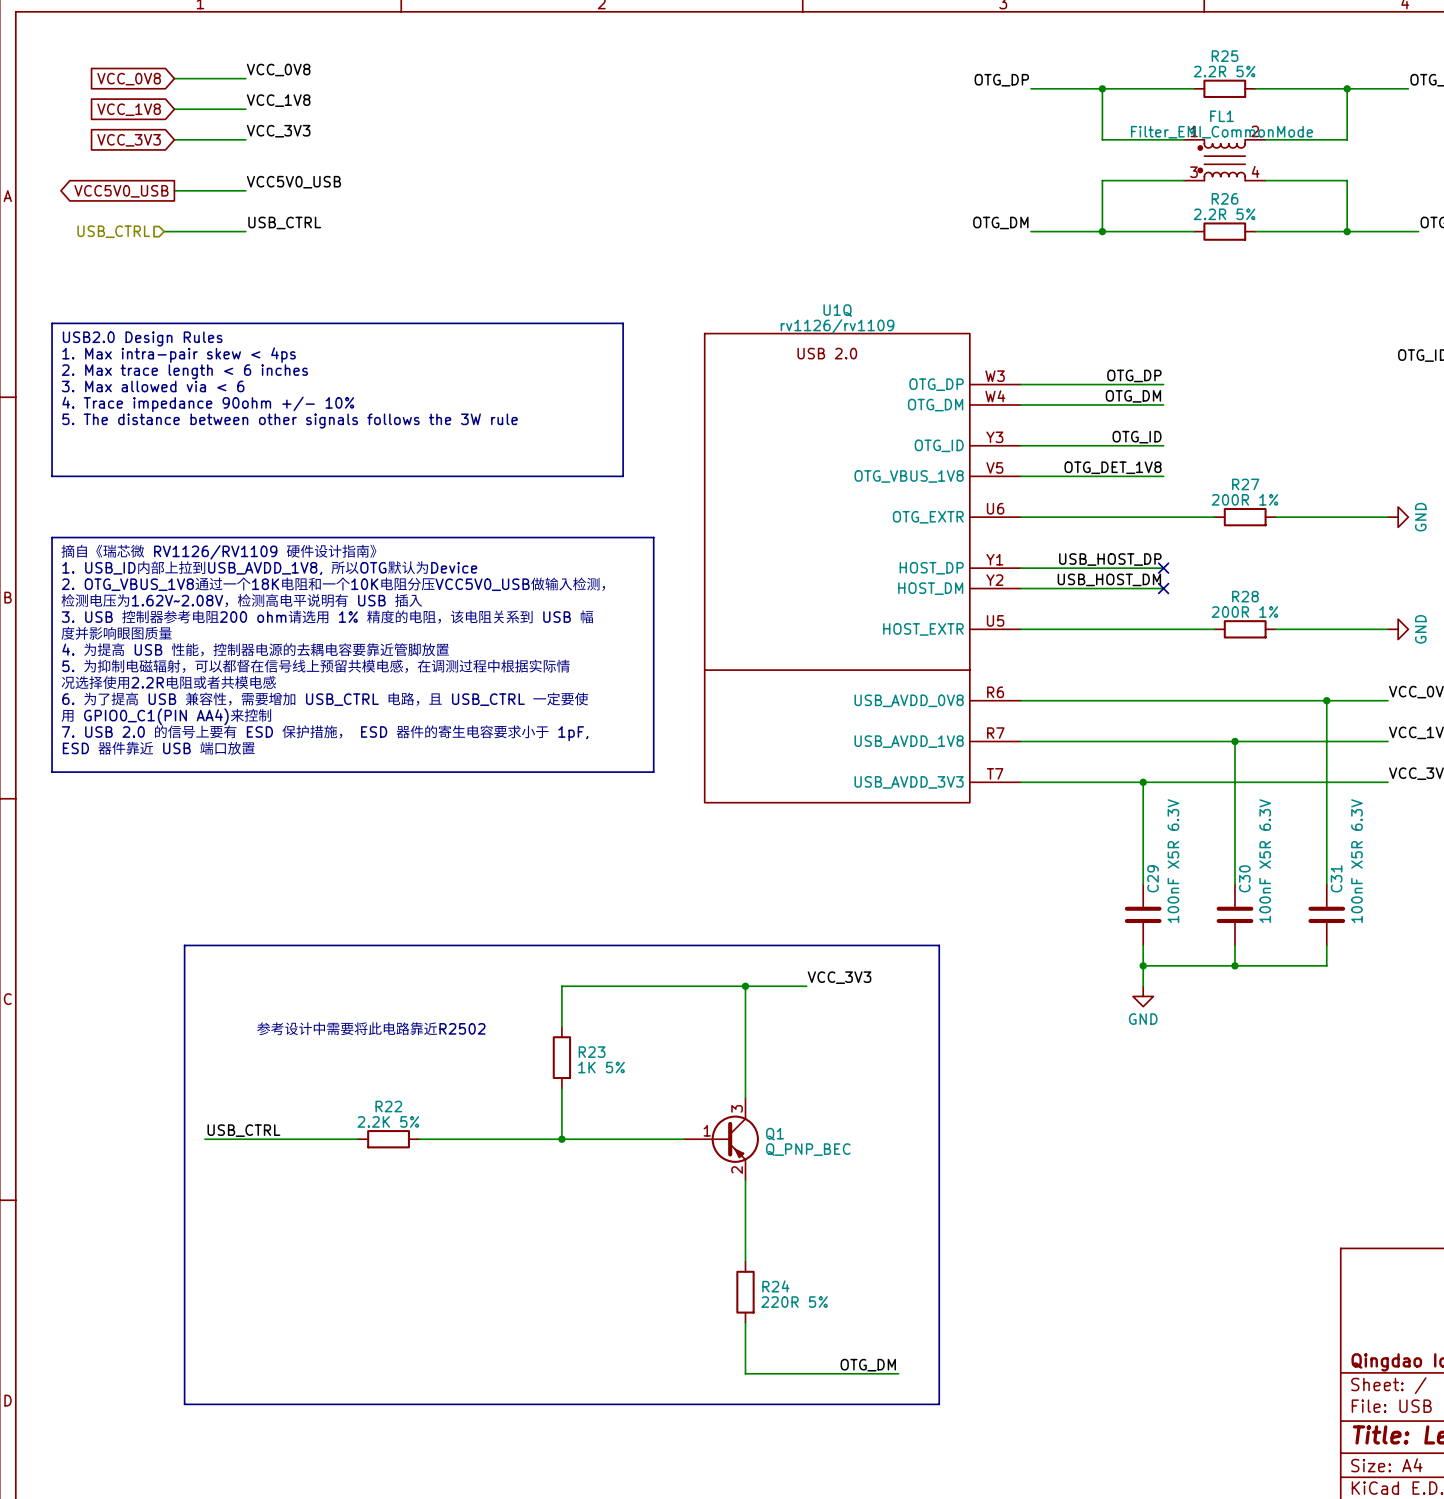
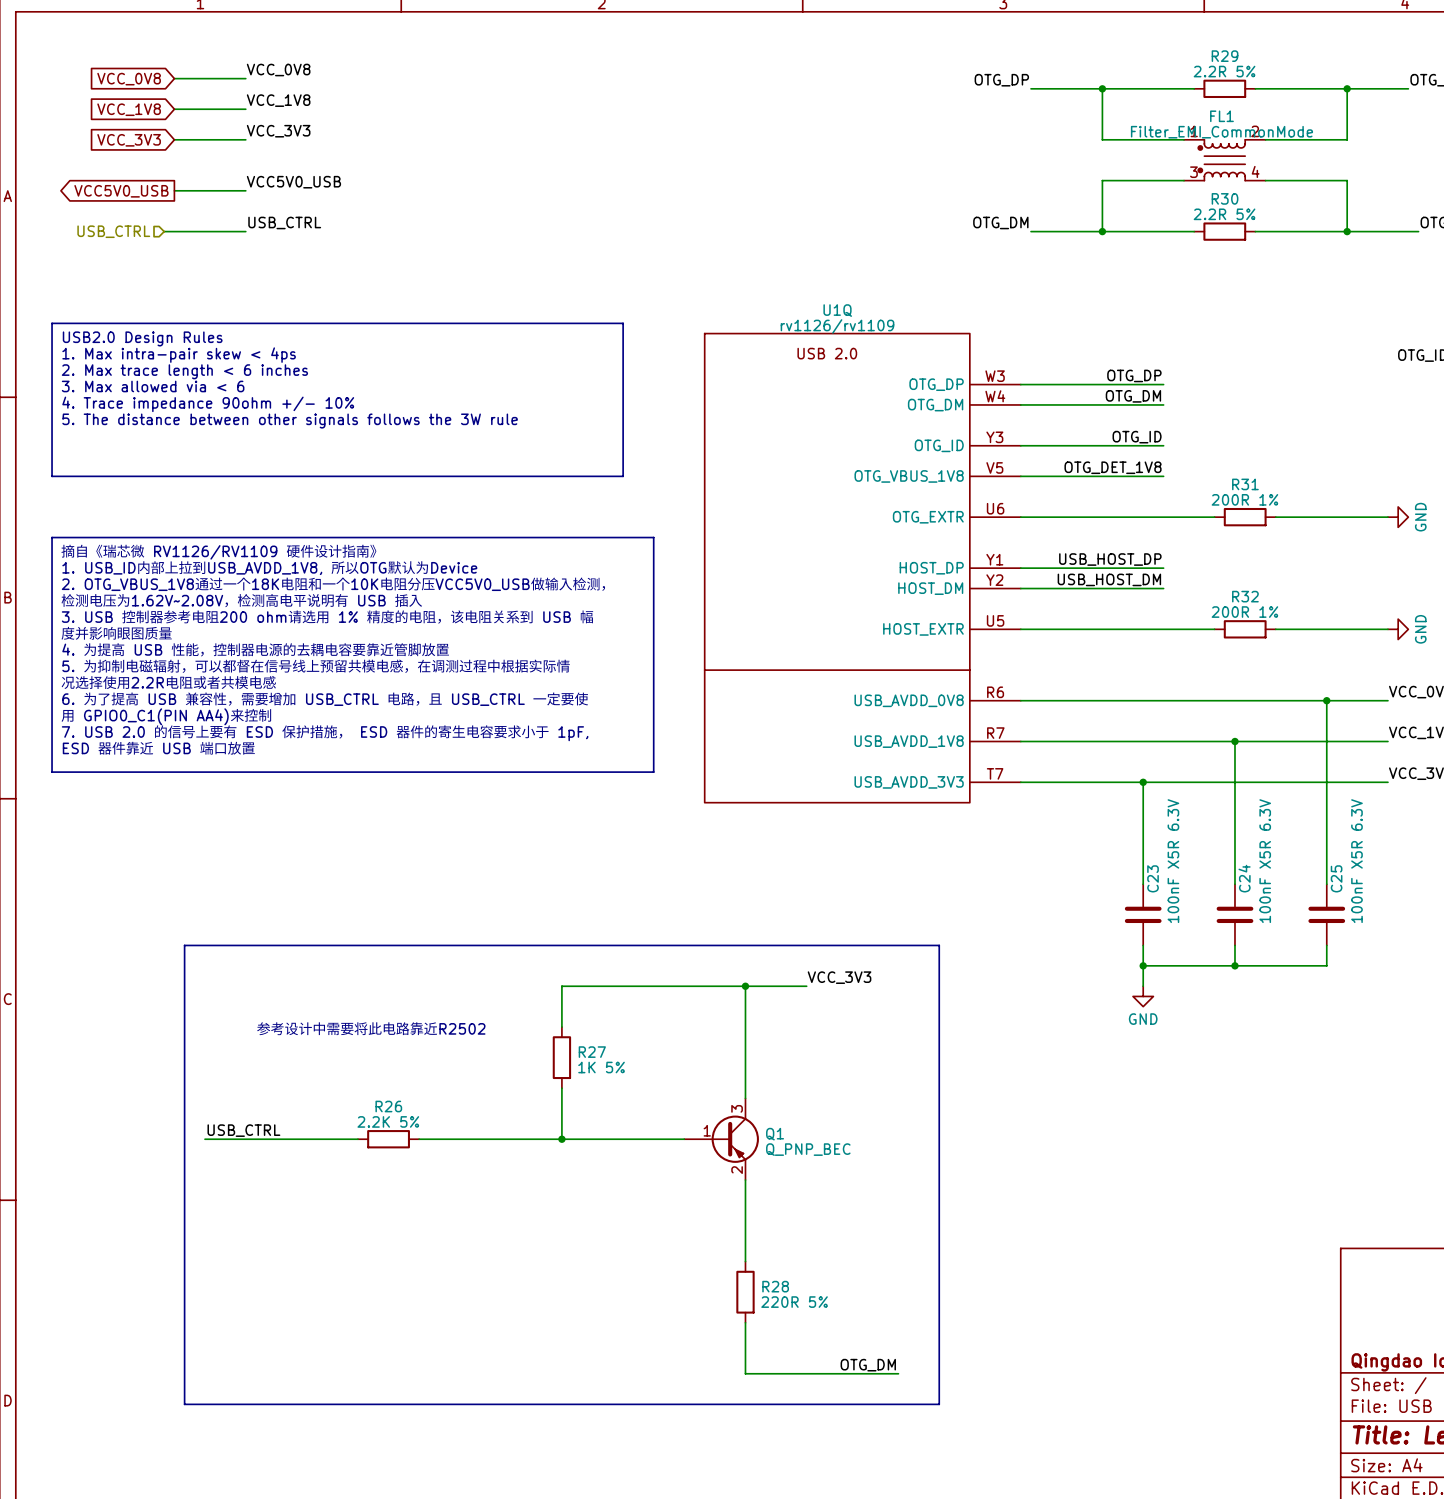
R25 name: R25 (1225, 56) -> R29 (1225, 56)
R26 name: R26 (1225, 198) -> R30 (1225, 198)
R27 name: R27 (1245, 484) -> R31 (1245, 484)
no-connect mark: (1163, 568) -> none
no-connect mark: (1163, 588) -> none
R28 name: R28 (1245, 596) -> R32 (1245, 596)
C29 name: C29 (1153, 878) -> C23 (1153, 878)
C30 name: C30 (1244, 878) -> C24 (1244, 878)
C31 name: C31 (1336, 878) -> C25 (1336, 878)
R23 name: R23 (592, 1052) -> R27 (592, 1052)
R22 name: R22 (388, 1106) -> R26 (388, 1106)
R24 name: R24 (775, 1286) -> R28 (775, 1286)

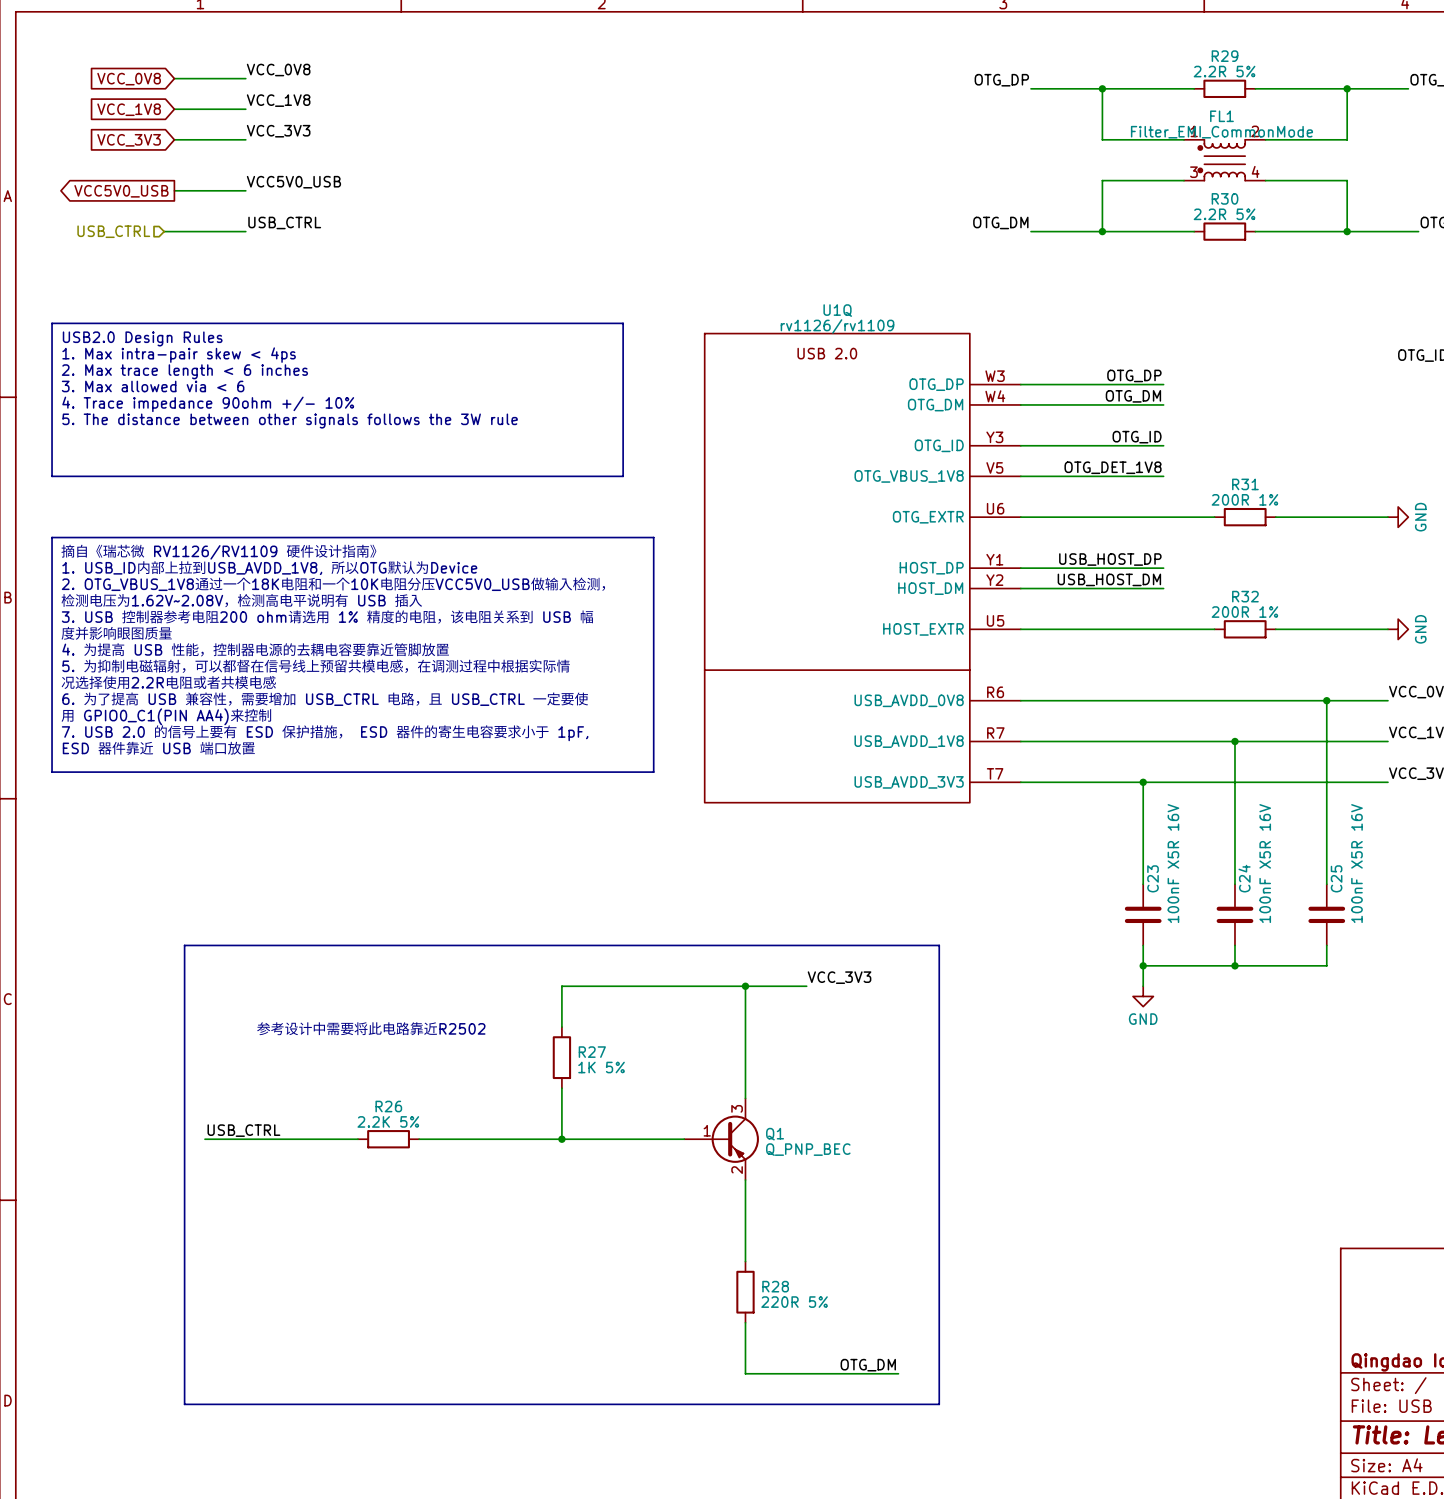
C23 value: 100nF X5R 6.3V (1173, 861) -> 100nF X5R 16V (1173, 863)
C24 value: 100nF X5R 6.3V (1265, 861) -> 100nF X5R 16V (1265, 863)
C25 value: 100nF X5R 6.3V (1356, 861) -> 100nF X5R 16V (1356, 863)

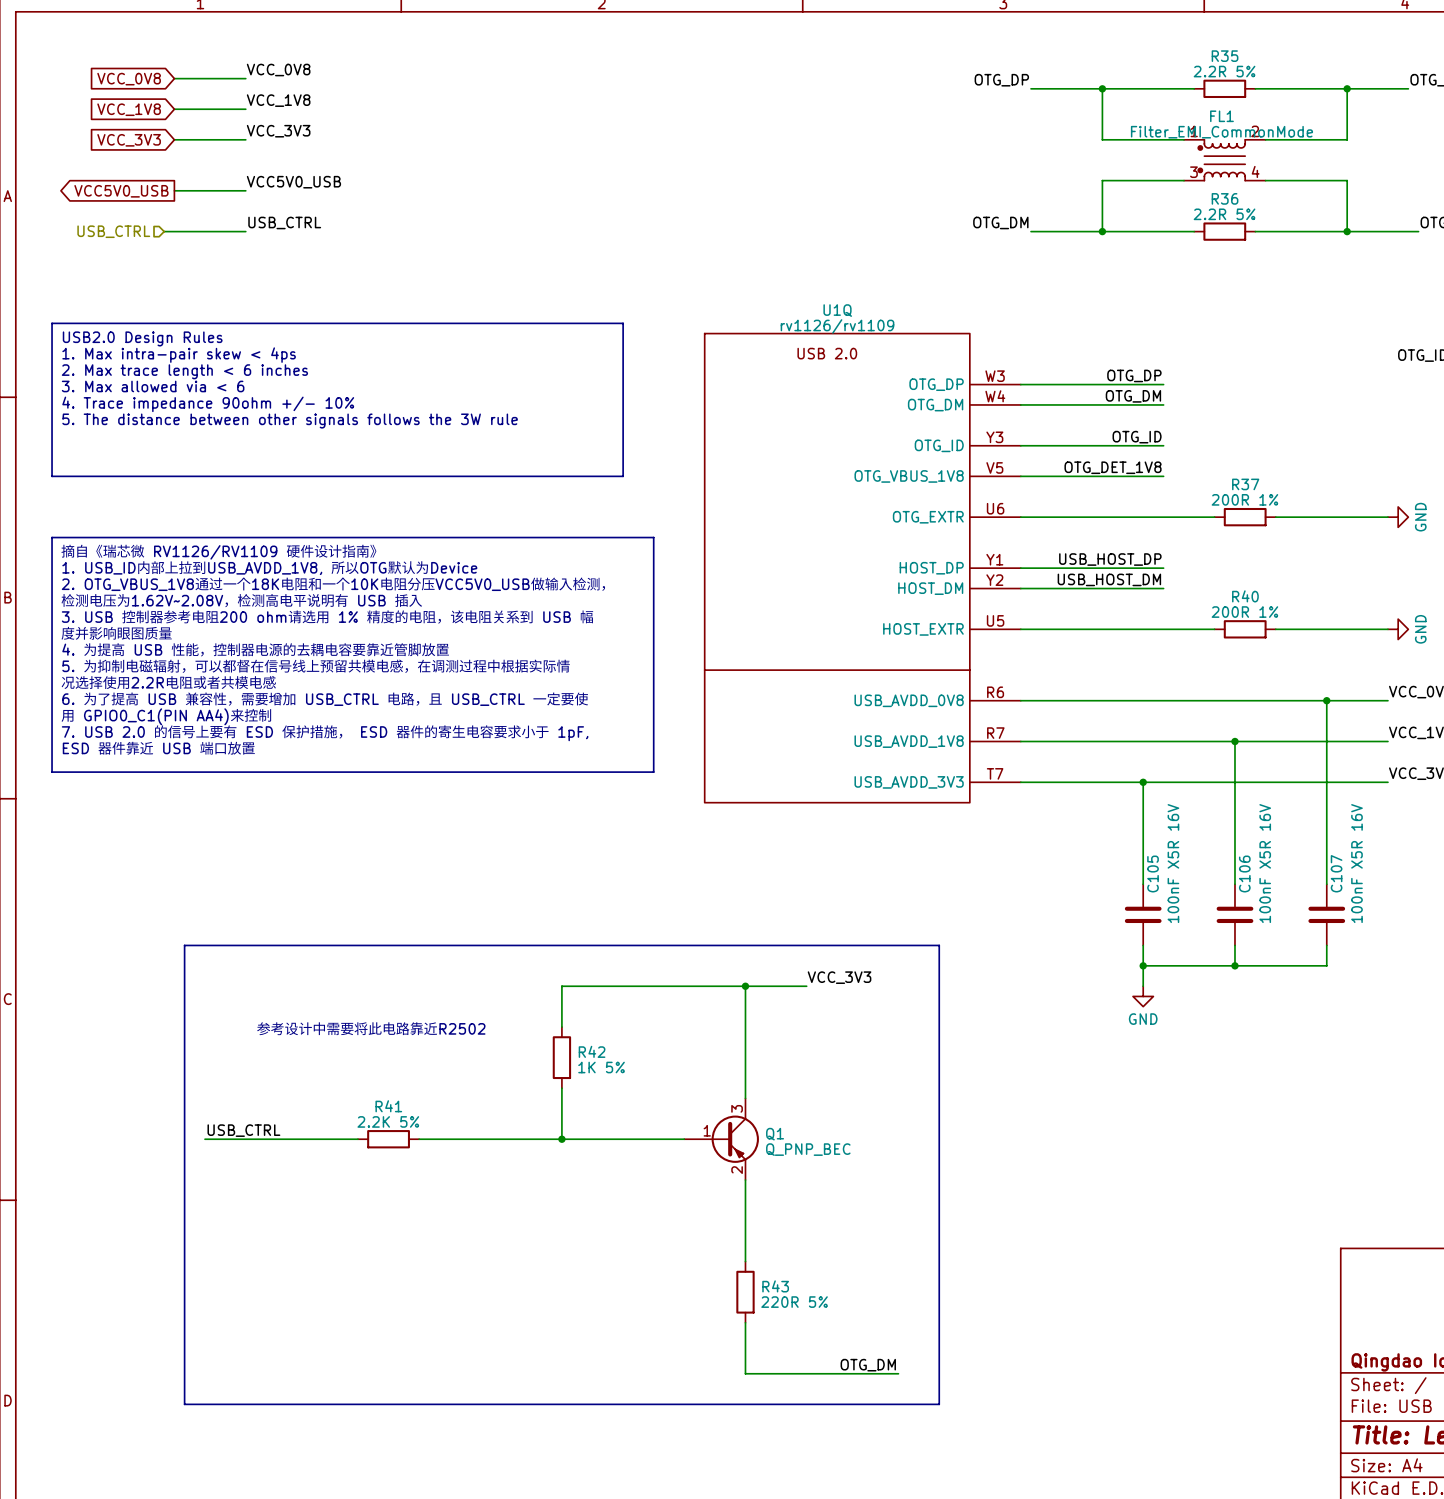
R29 name: R29 (1225, 56) -> R35 (1225, 56)
R30 name: R30 (1225, 198) -> R36 (1225, 198)
R31 name: R31 (1245, 484) -> R37 (1245, 484)
R32 name: R32 (1245, 596) -> R40 (1245, 596)
C23 name: C23 (1153, 878) -> C105 (1153, 874)
C24 name: C24 (1244, 878) -> C106 (1244, 874)
C25 name: C25 (1336, 878) -> C107 (1336, 873)
R27 name: R27 (592, 1052) -> R42 (592, 1051)
R26 name: R26 (388, 1106) -> R41 (388, 1106)
R28 name: R28 (775, 1286) -> R43 (775, 1286)

